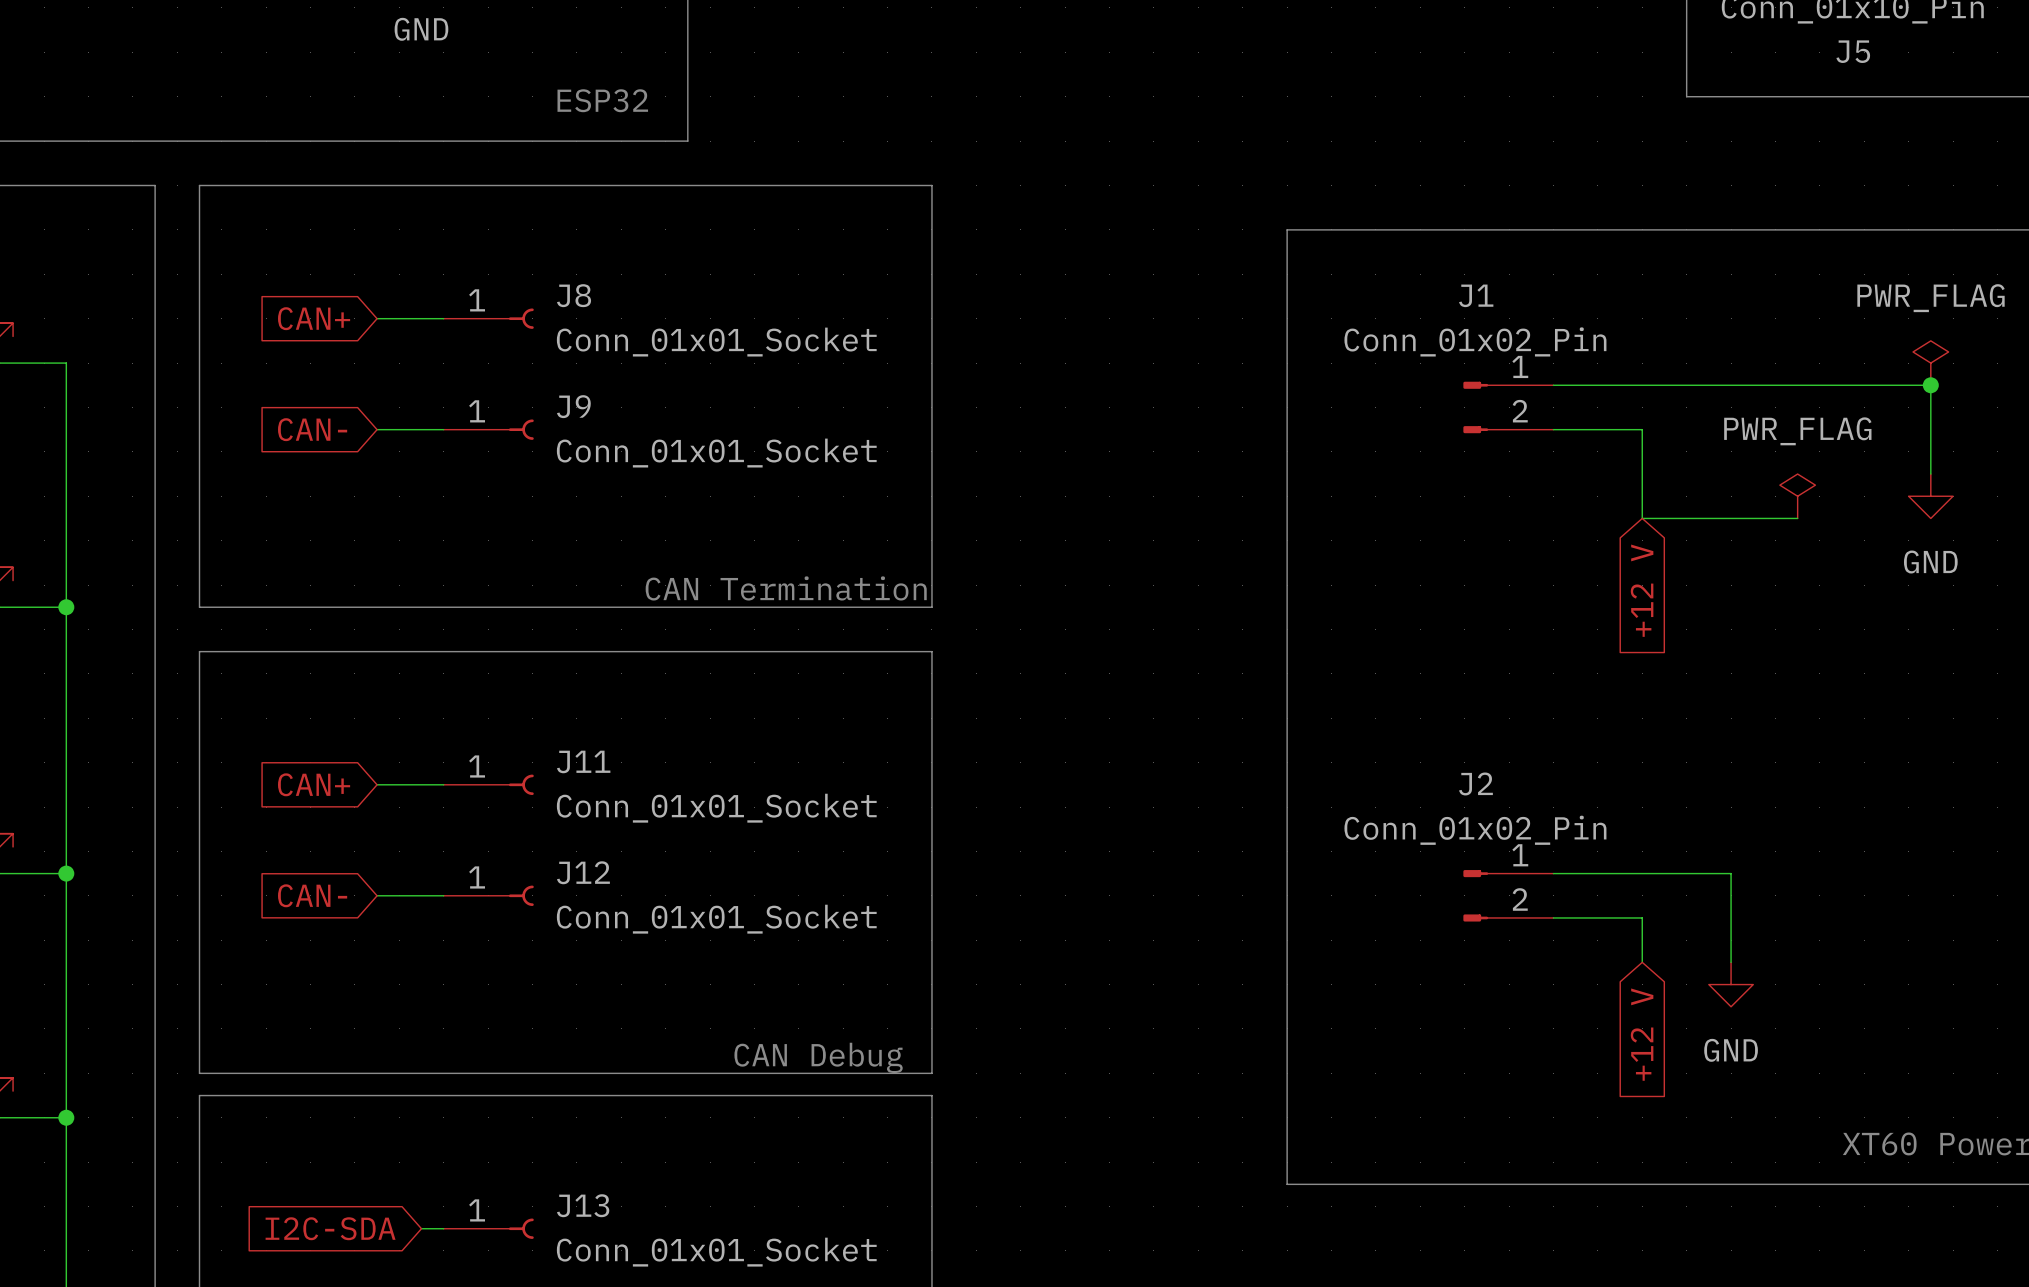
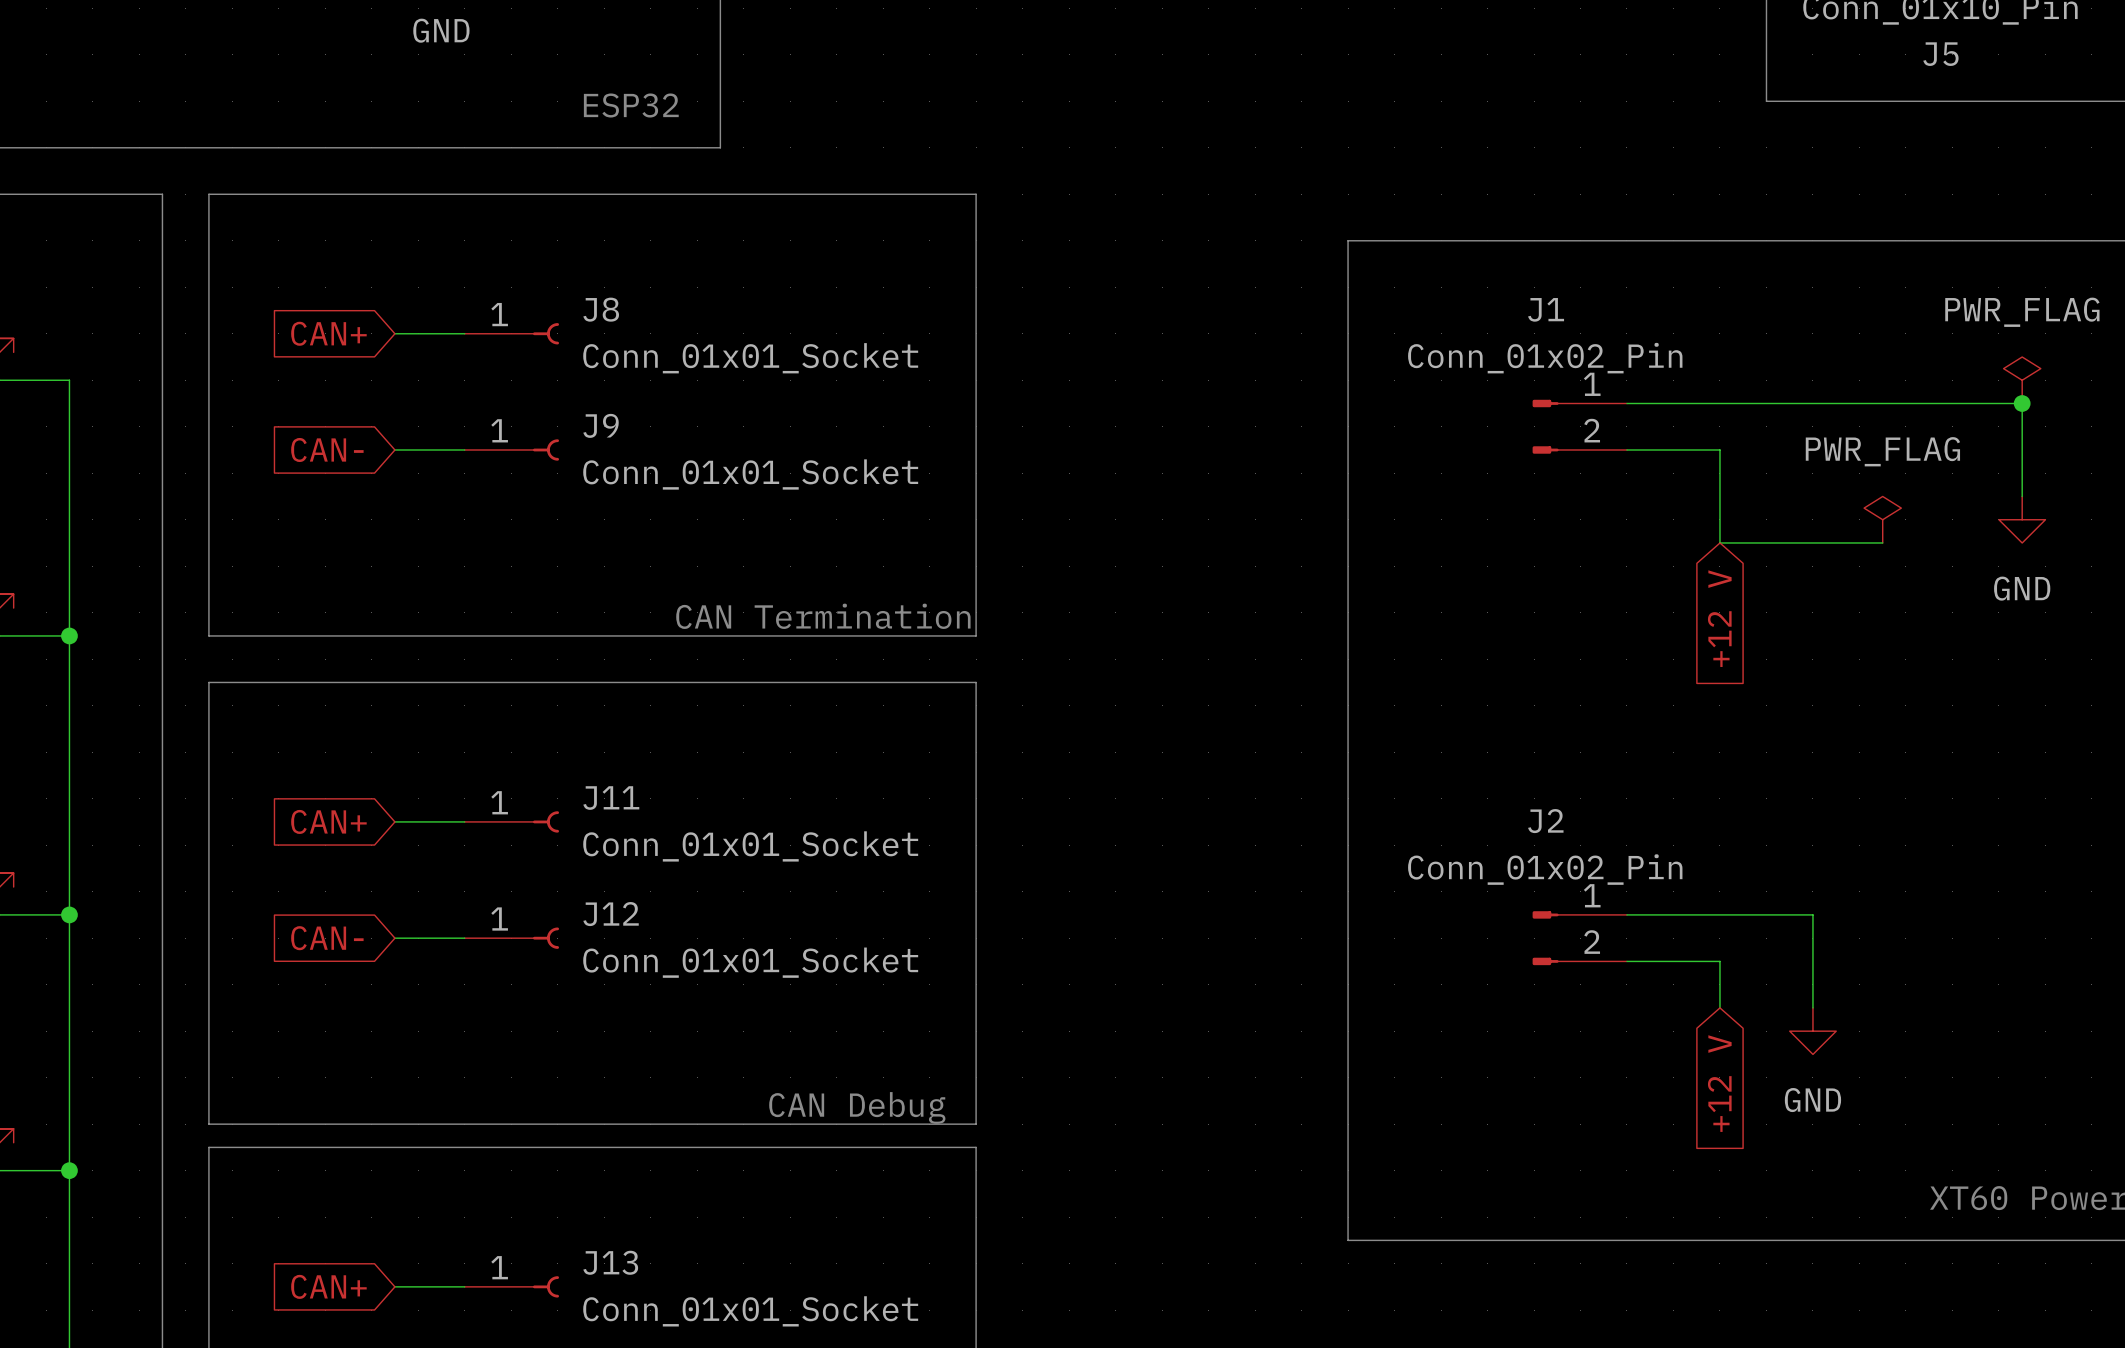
global label: none -> CAN+ (328, 1286)
global label: I2C-SDA (330, 1228) -> none
wire: none -> (394, 1286) (441, 1286)

